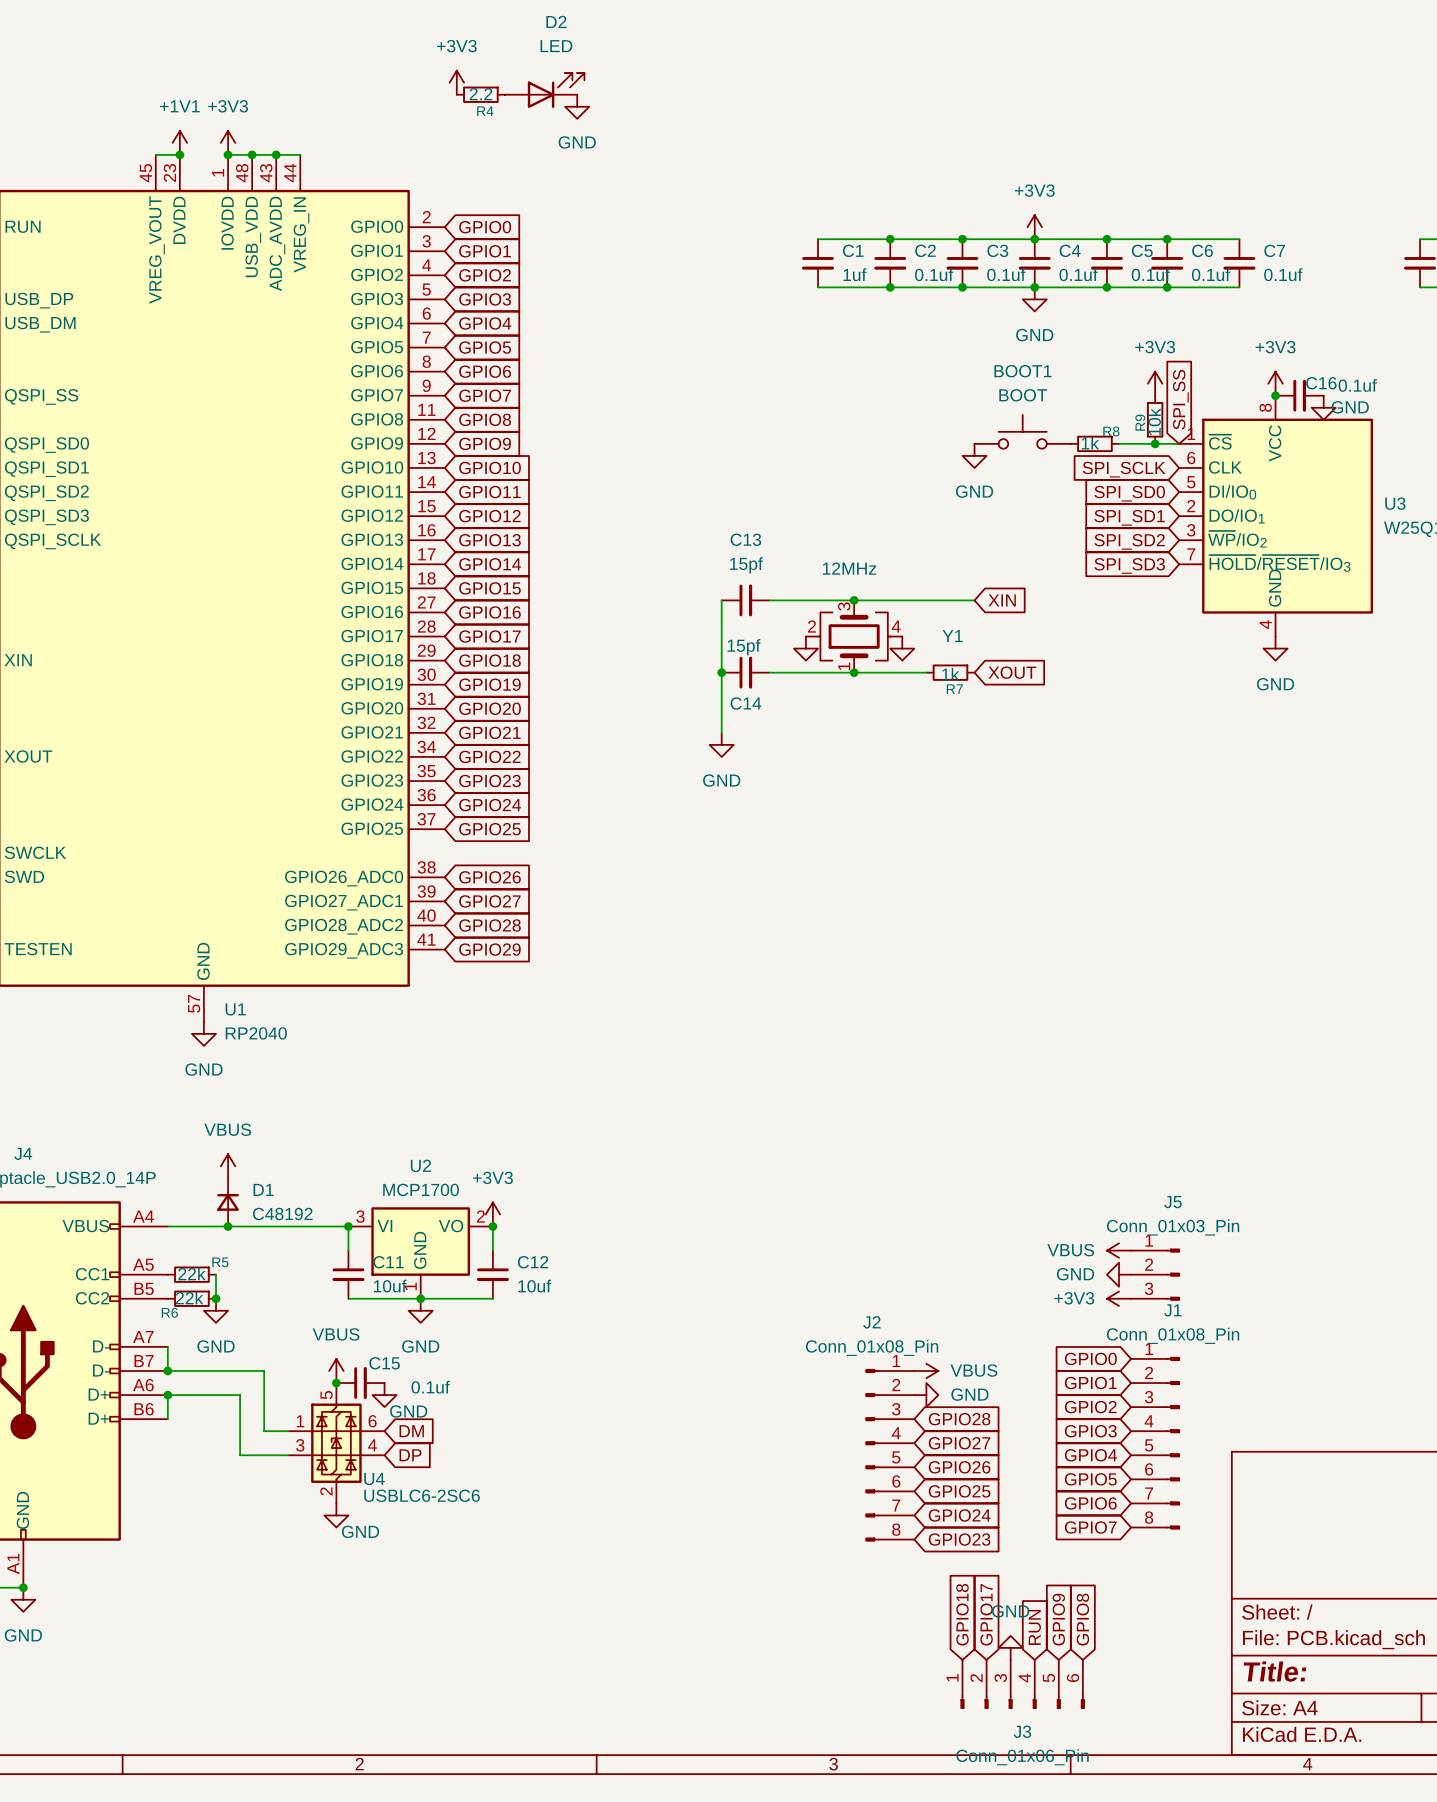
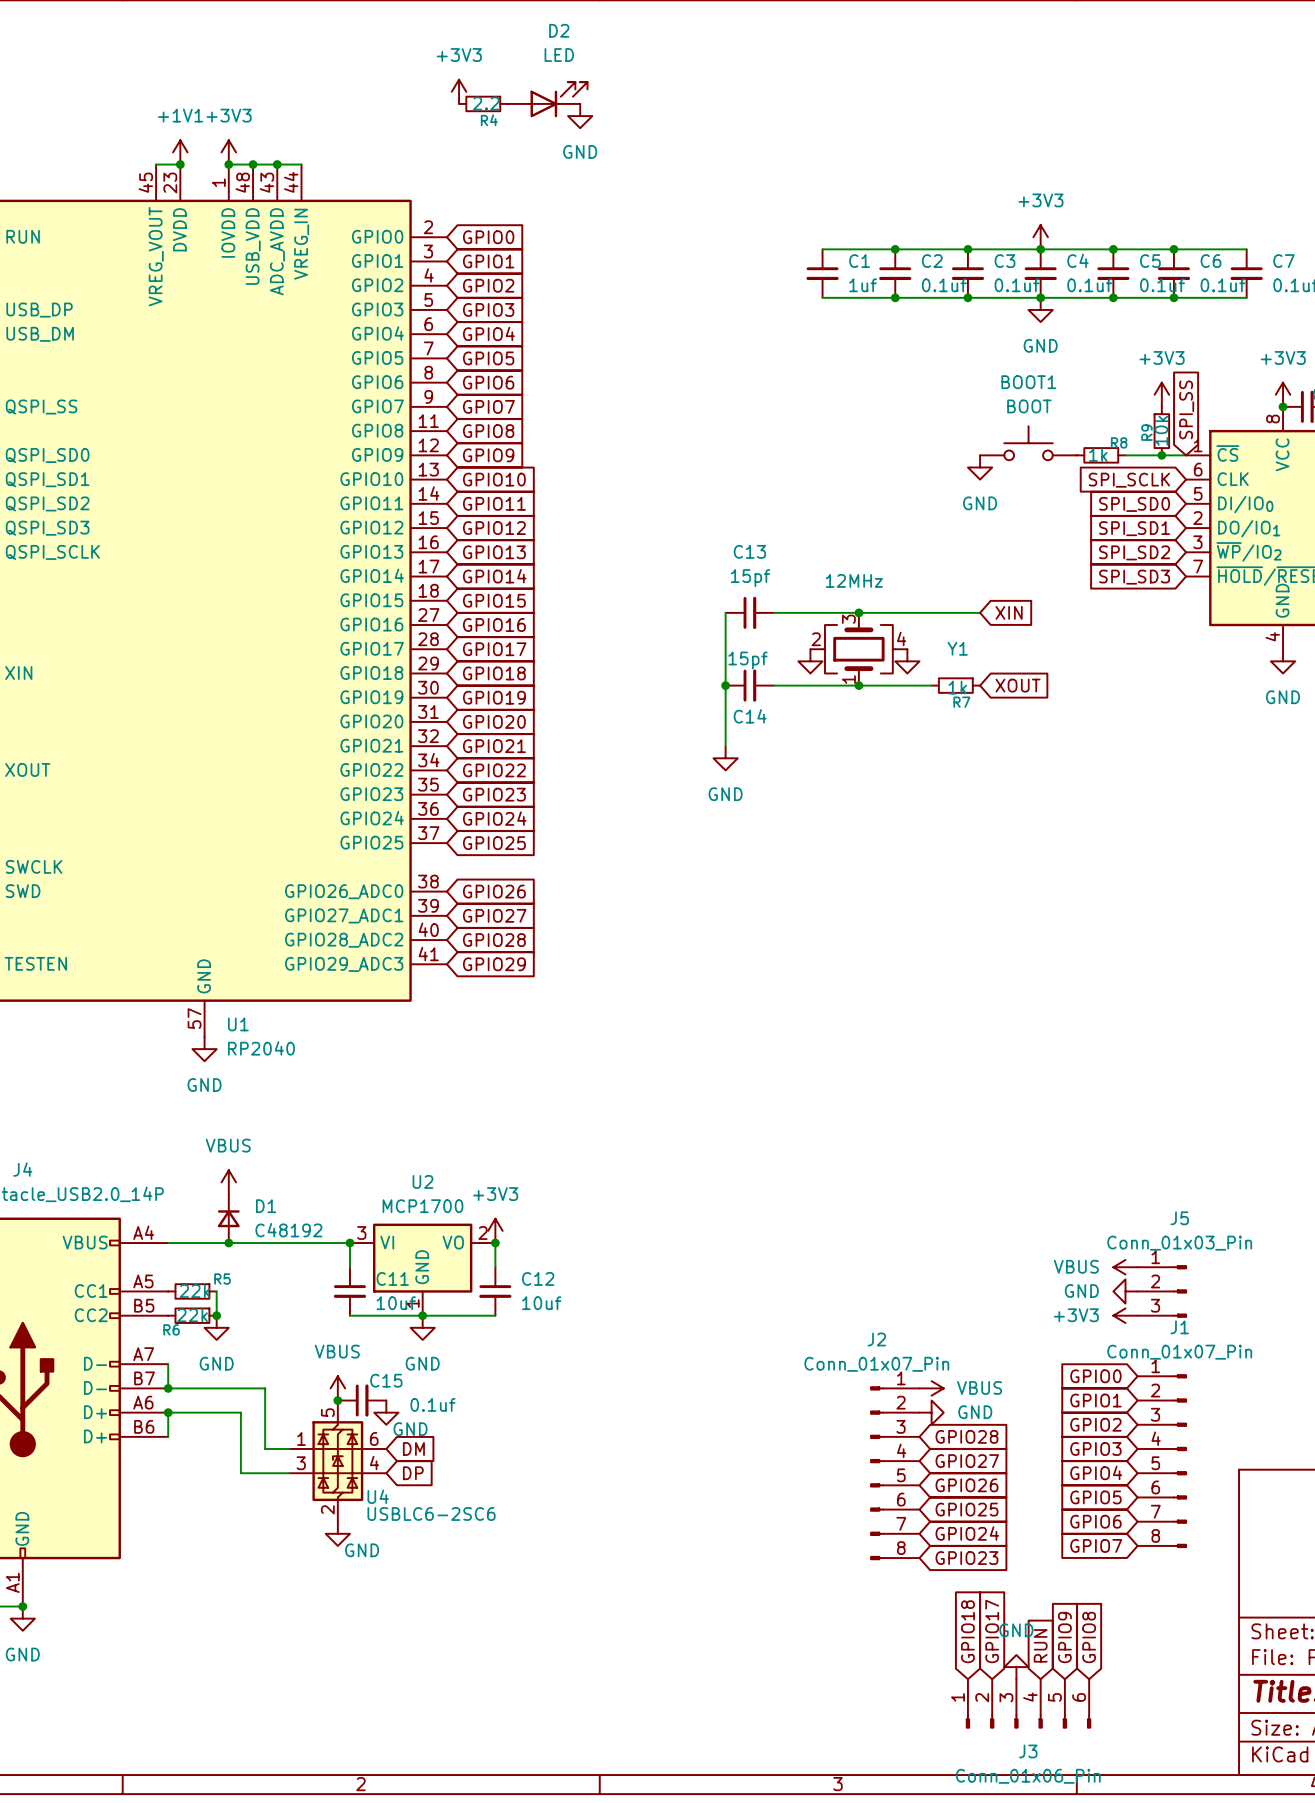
J1 value: Conn_01x08_Pin (1173, 1335) -> Conn_01x07_Pin (1179, 1352)
J2 value: Conn_01x08_Pin (872, 1347) -> Conn_01x07_Pin (876, 1364)

